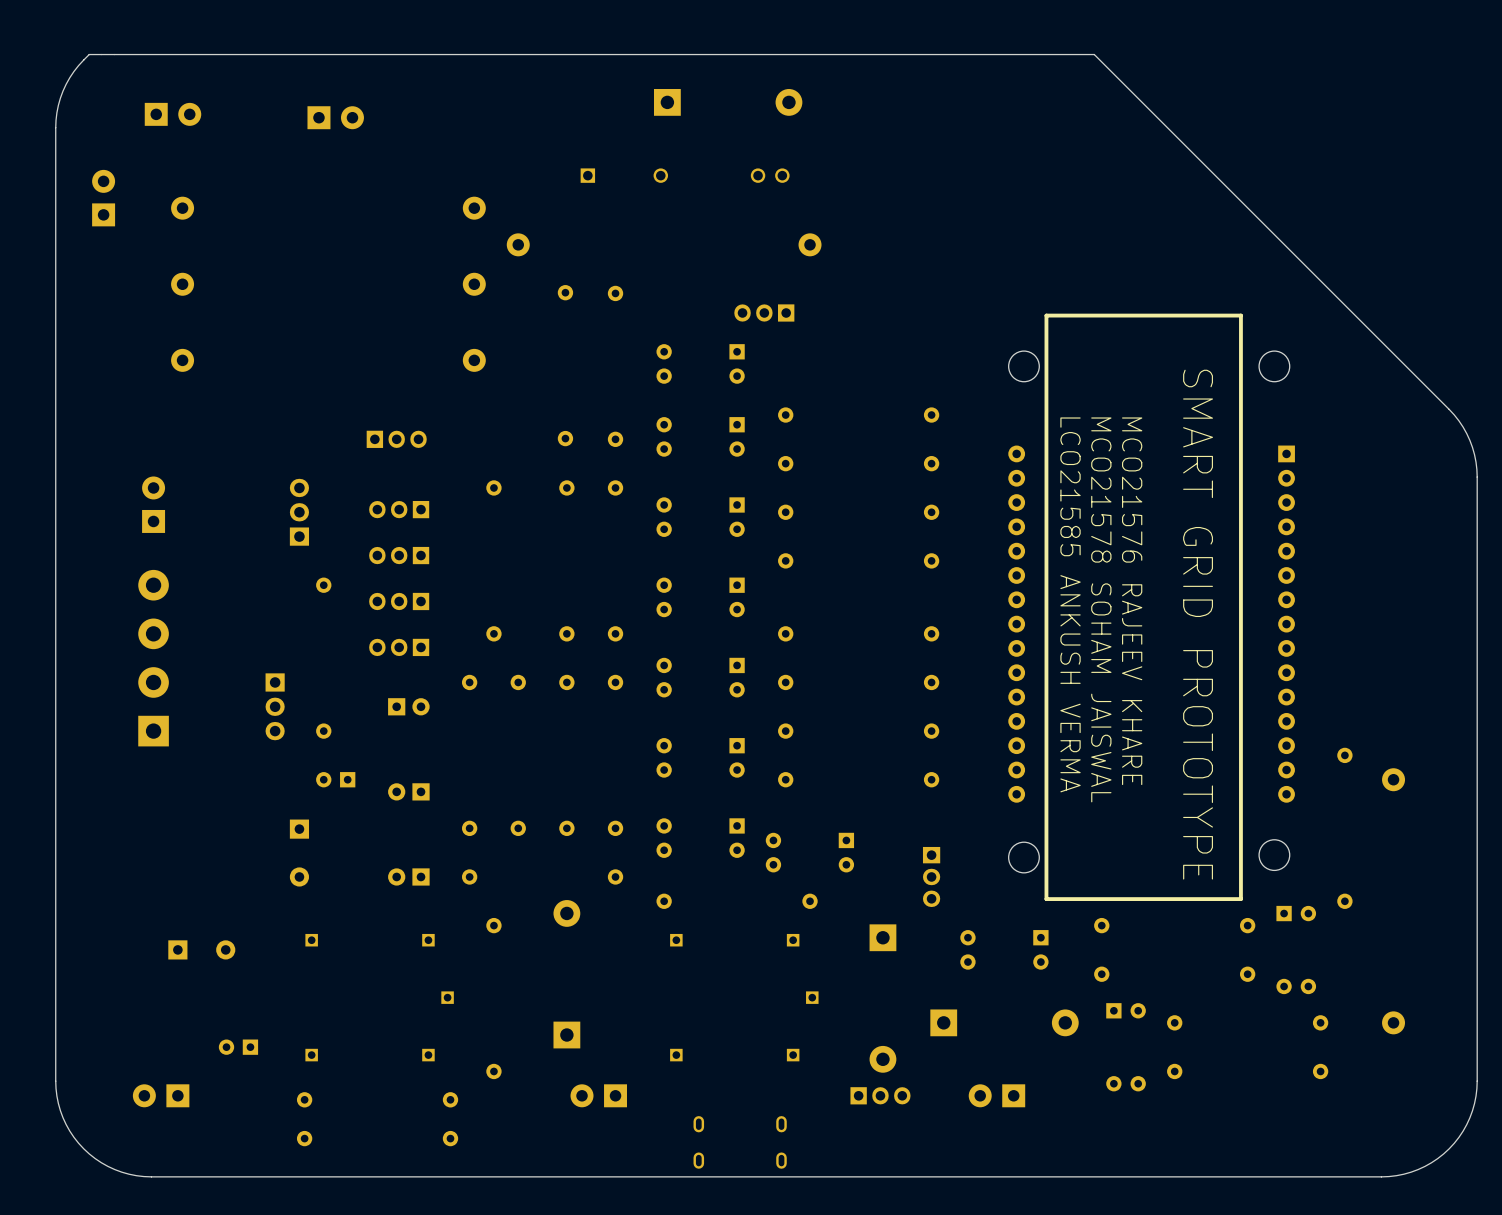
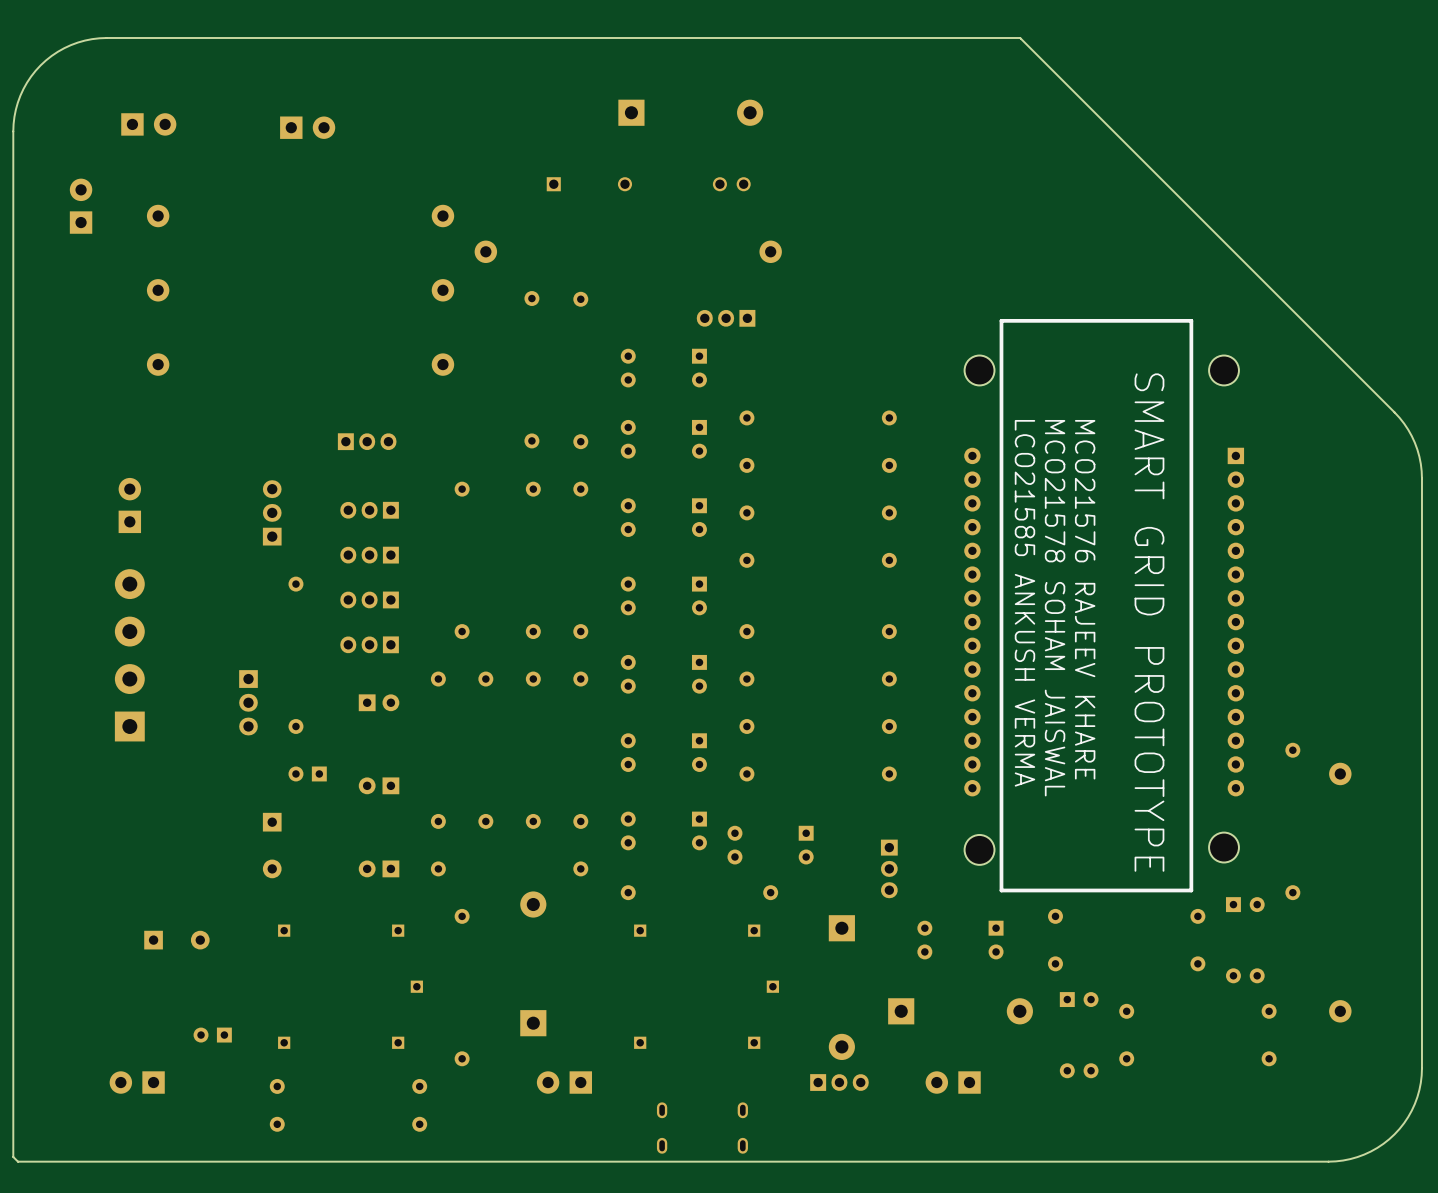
board edge: (1094, 54) (89, 54) (78, 65) (63, 91) (58, 105) (55, 127) (56, 1088) (58, 1103) (66, 1124) (74, 1137) (89, 1153) (108, 1166) (121, 1172) (151, 1176) -> (1048, 66) (1020, 37) (106, 37) (92, 39) (70, 45) (51, 55) (35, 70) (20, 95) (15, 109) (13, 131) (13, 1157) (17, 1161) (127, 1161)

